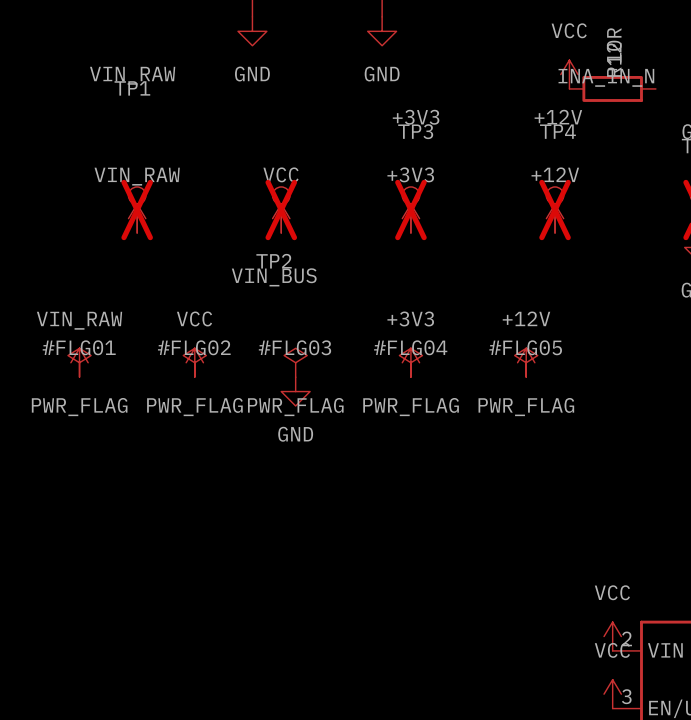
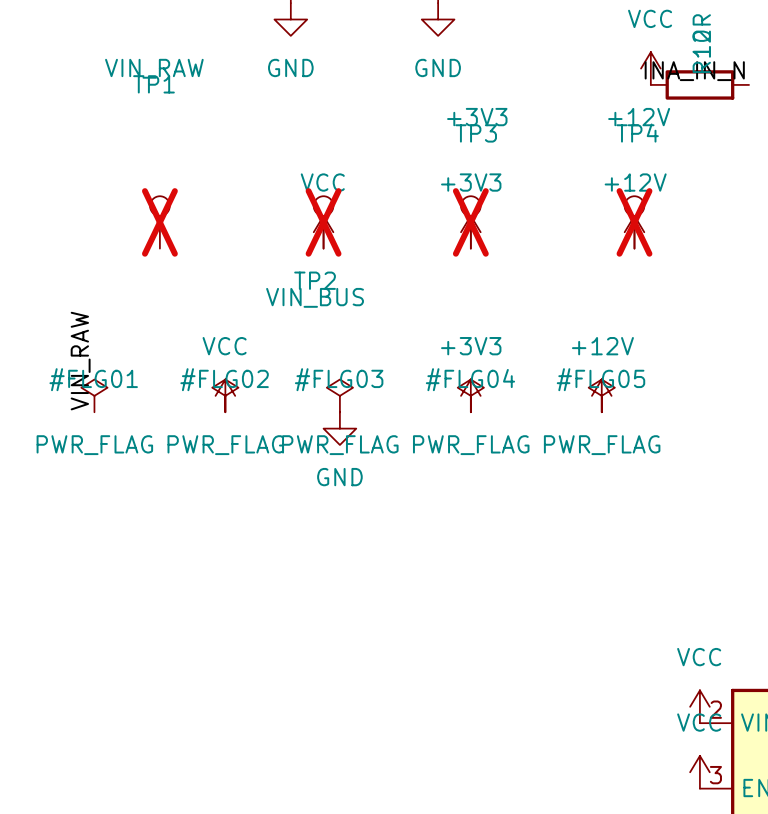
power symbol: VIN_RAW (137, 218) -> none
label: none -> VIN_RAW (80, 361)
power symbol: VIN_RAW (79, 362) -> none

